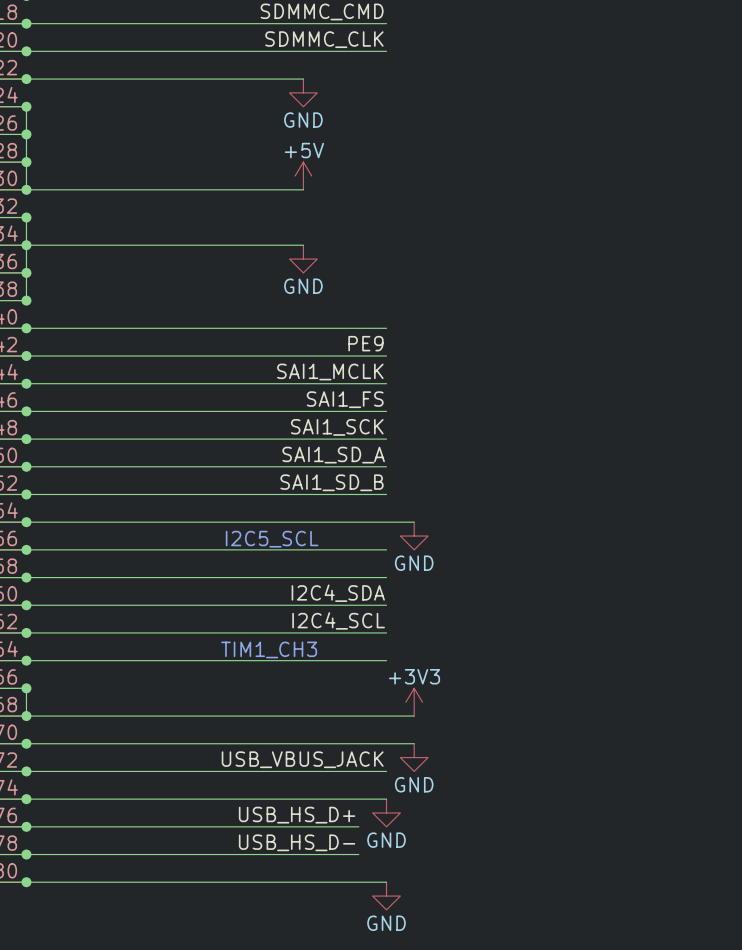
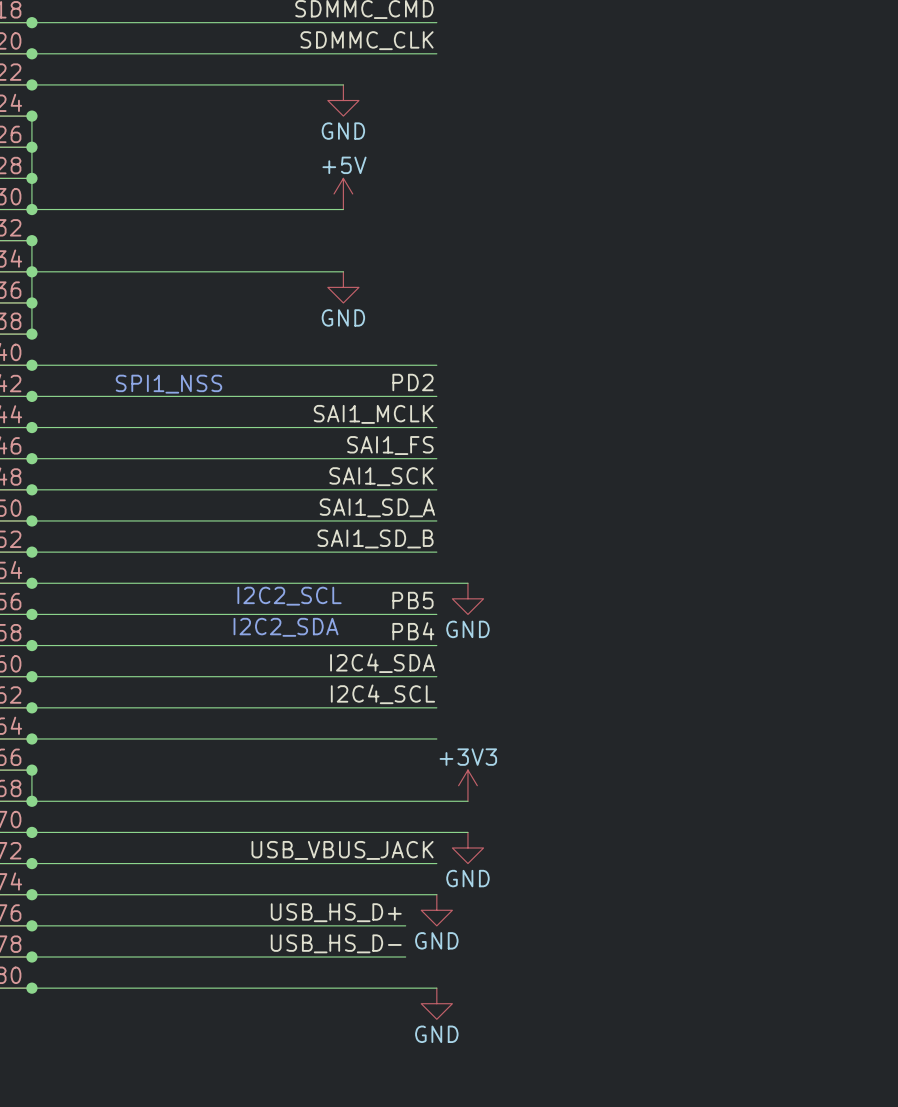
label: PE9 (365, 343) -> PD2 (412, 382)
text: none -> SPI1_NSS (168, 384)
text: none -> I2C2_SCL (289, 596)
label: none -> PB5 (412, 600)
text: I2C5_SCL (272, 539) -> none
text: none -> I2C2_SDA (286, 627)
label: none -> PB4 (413, 631)
text: TIM1_CH3 (269, 649) -> none

